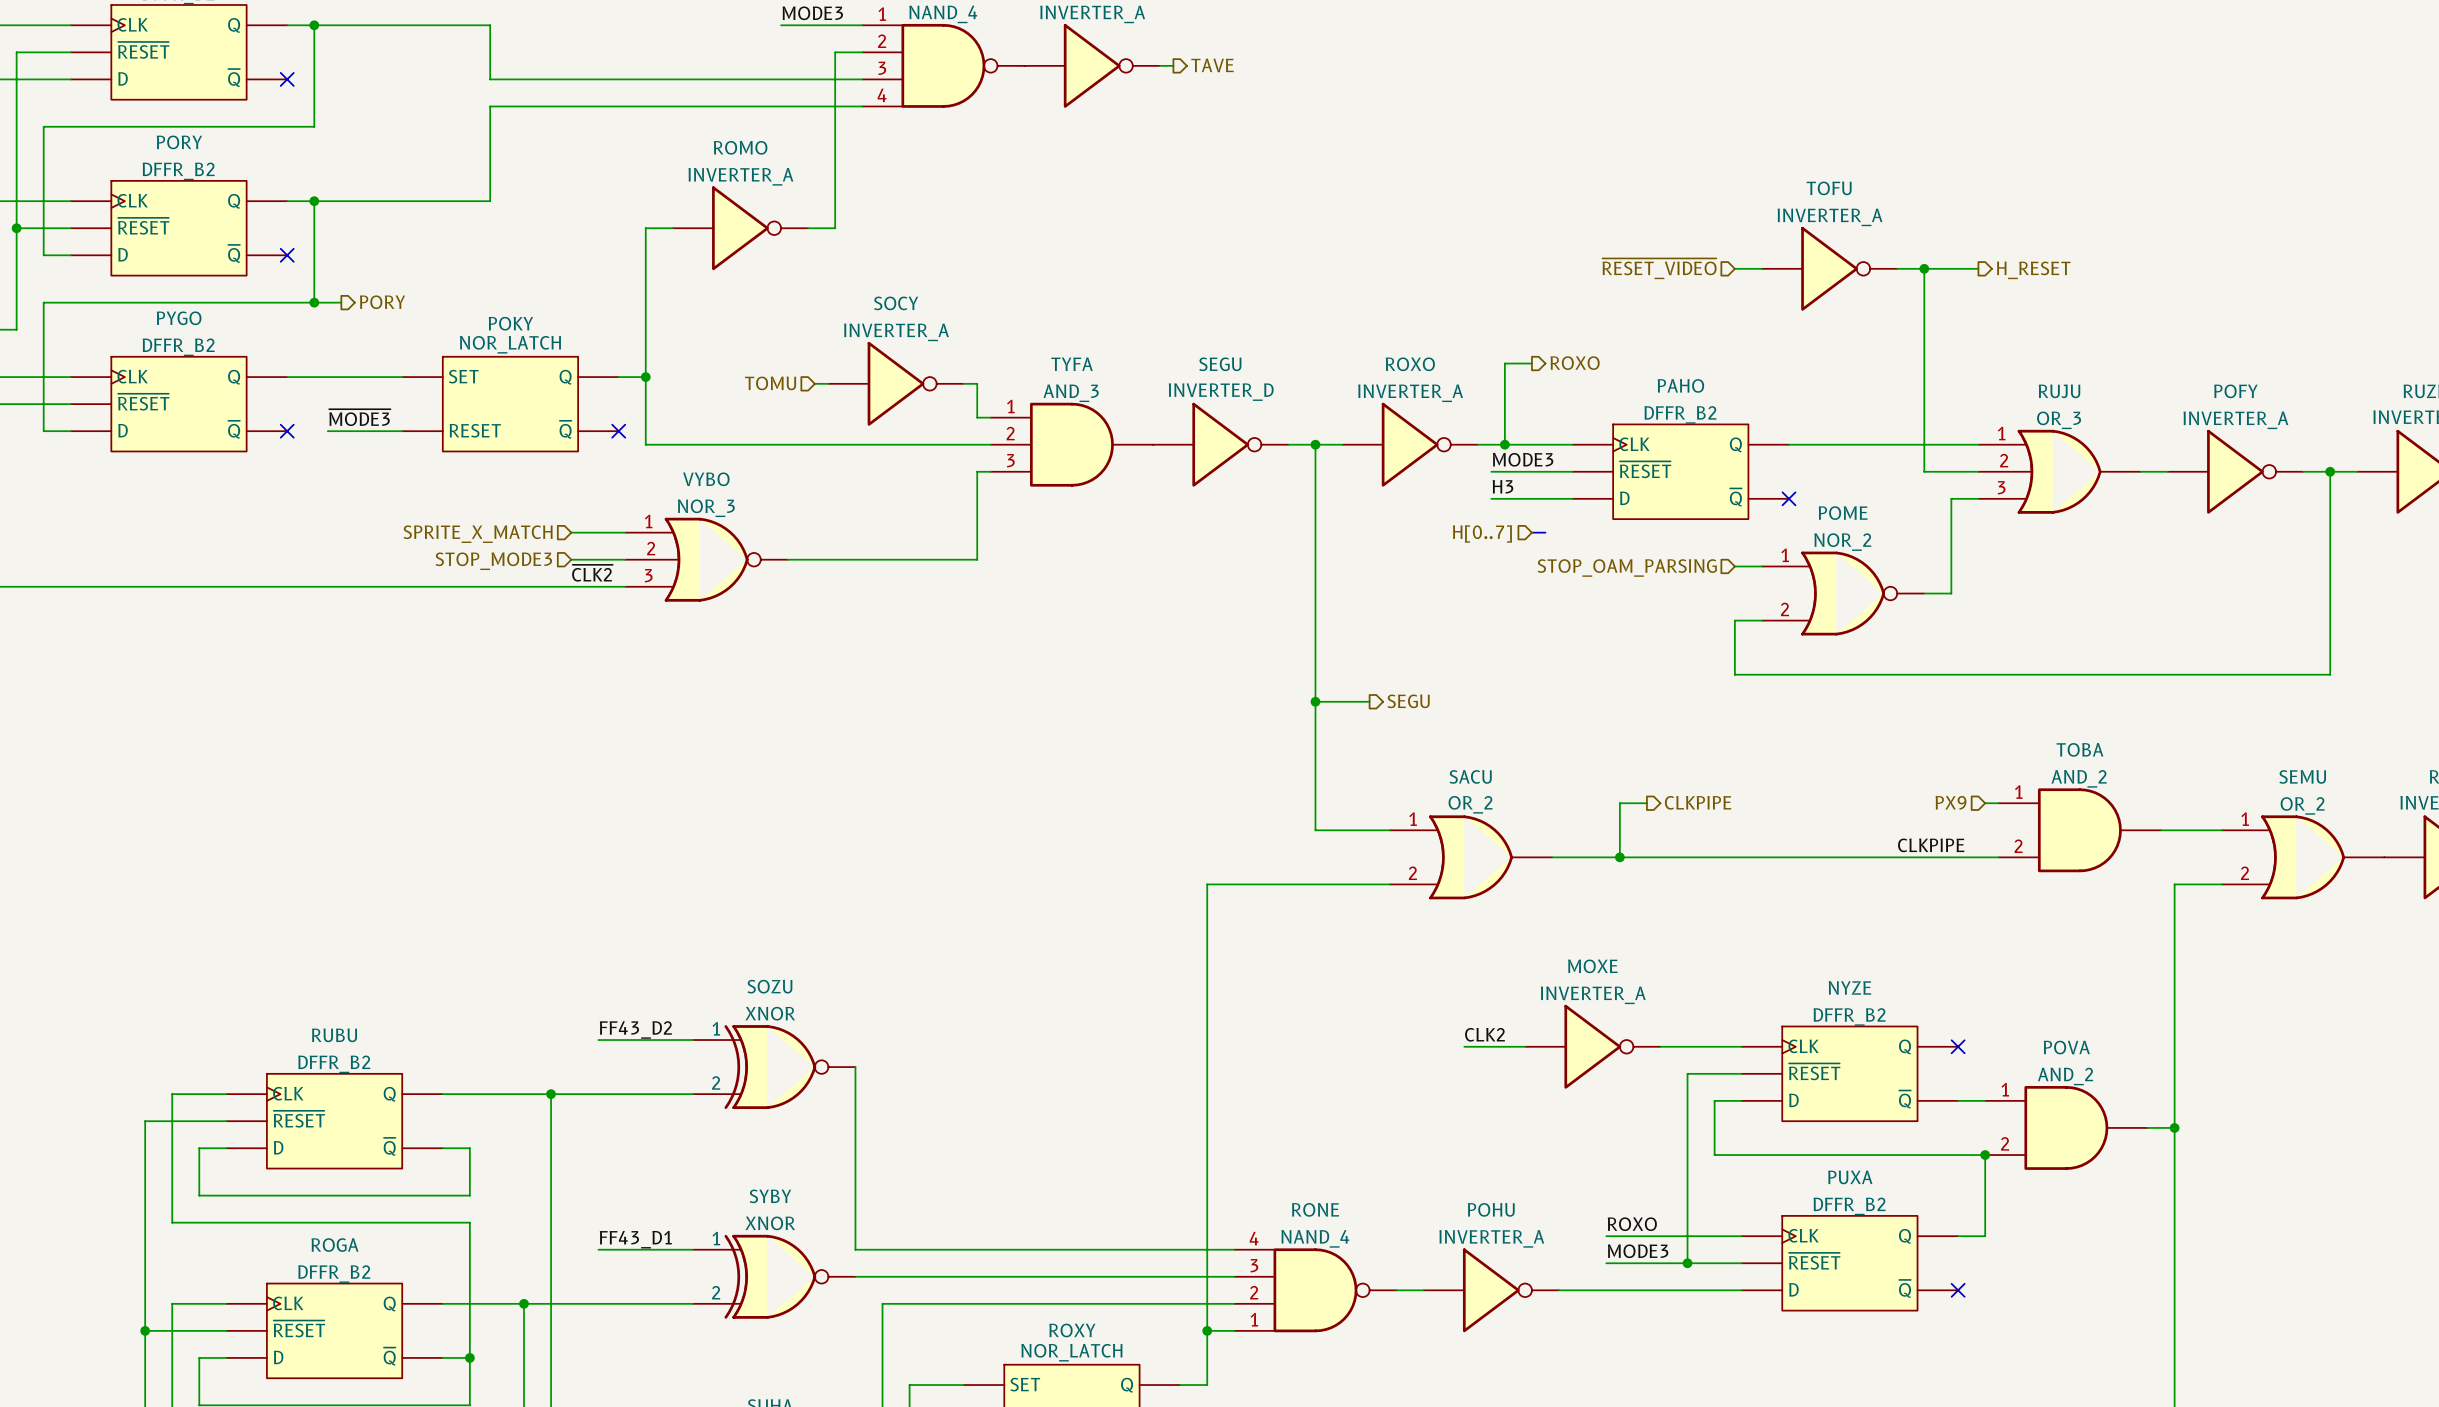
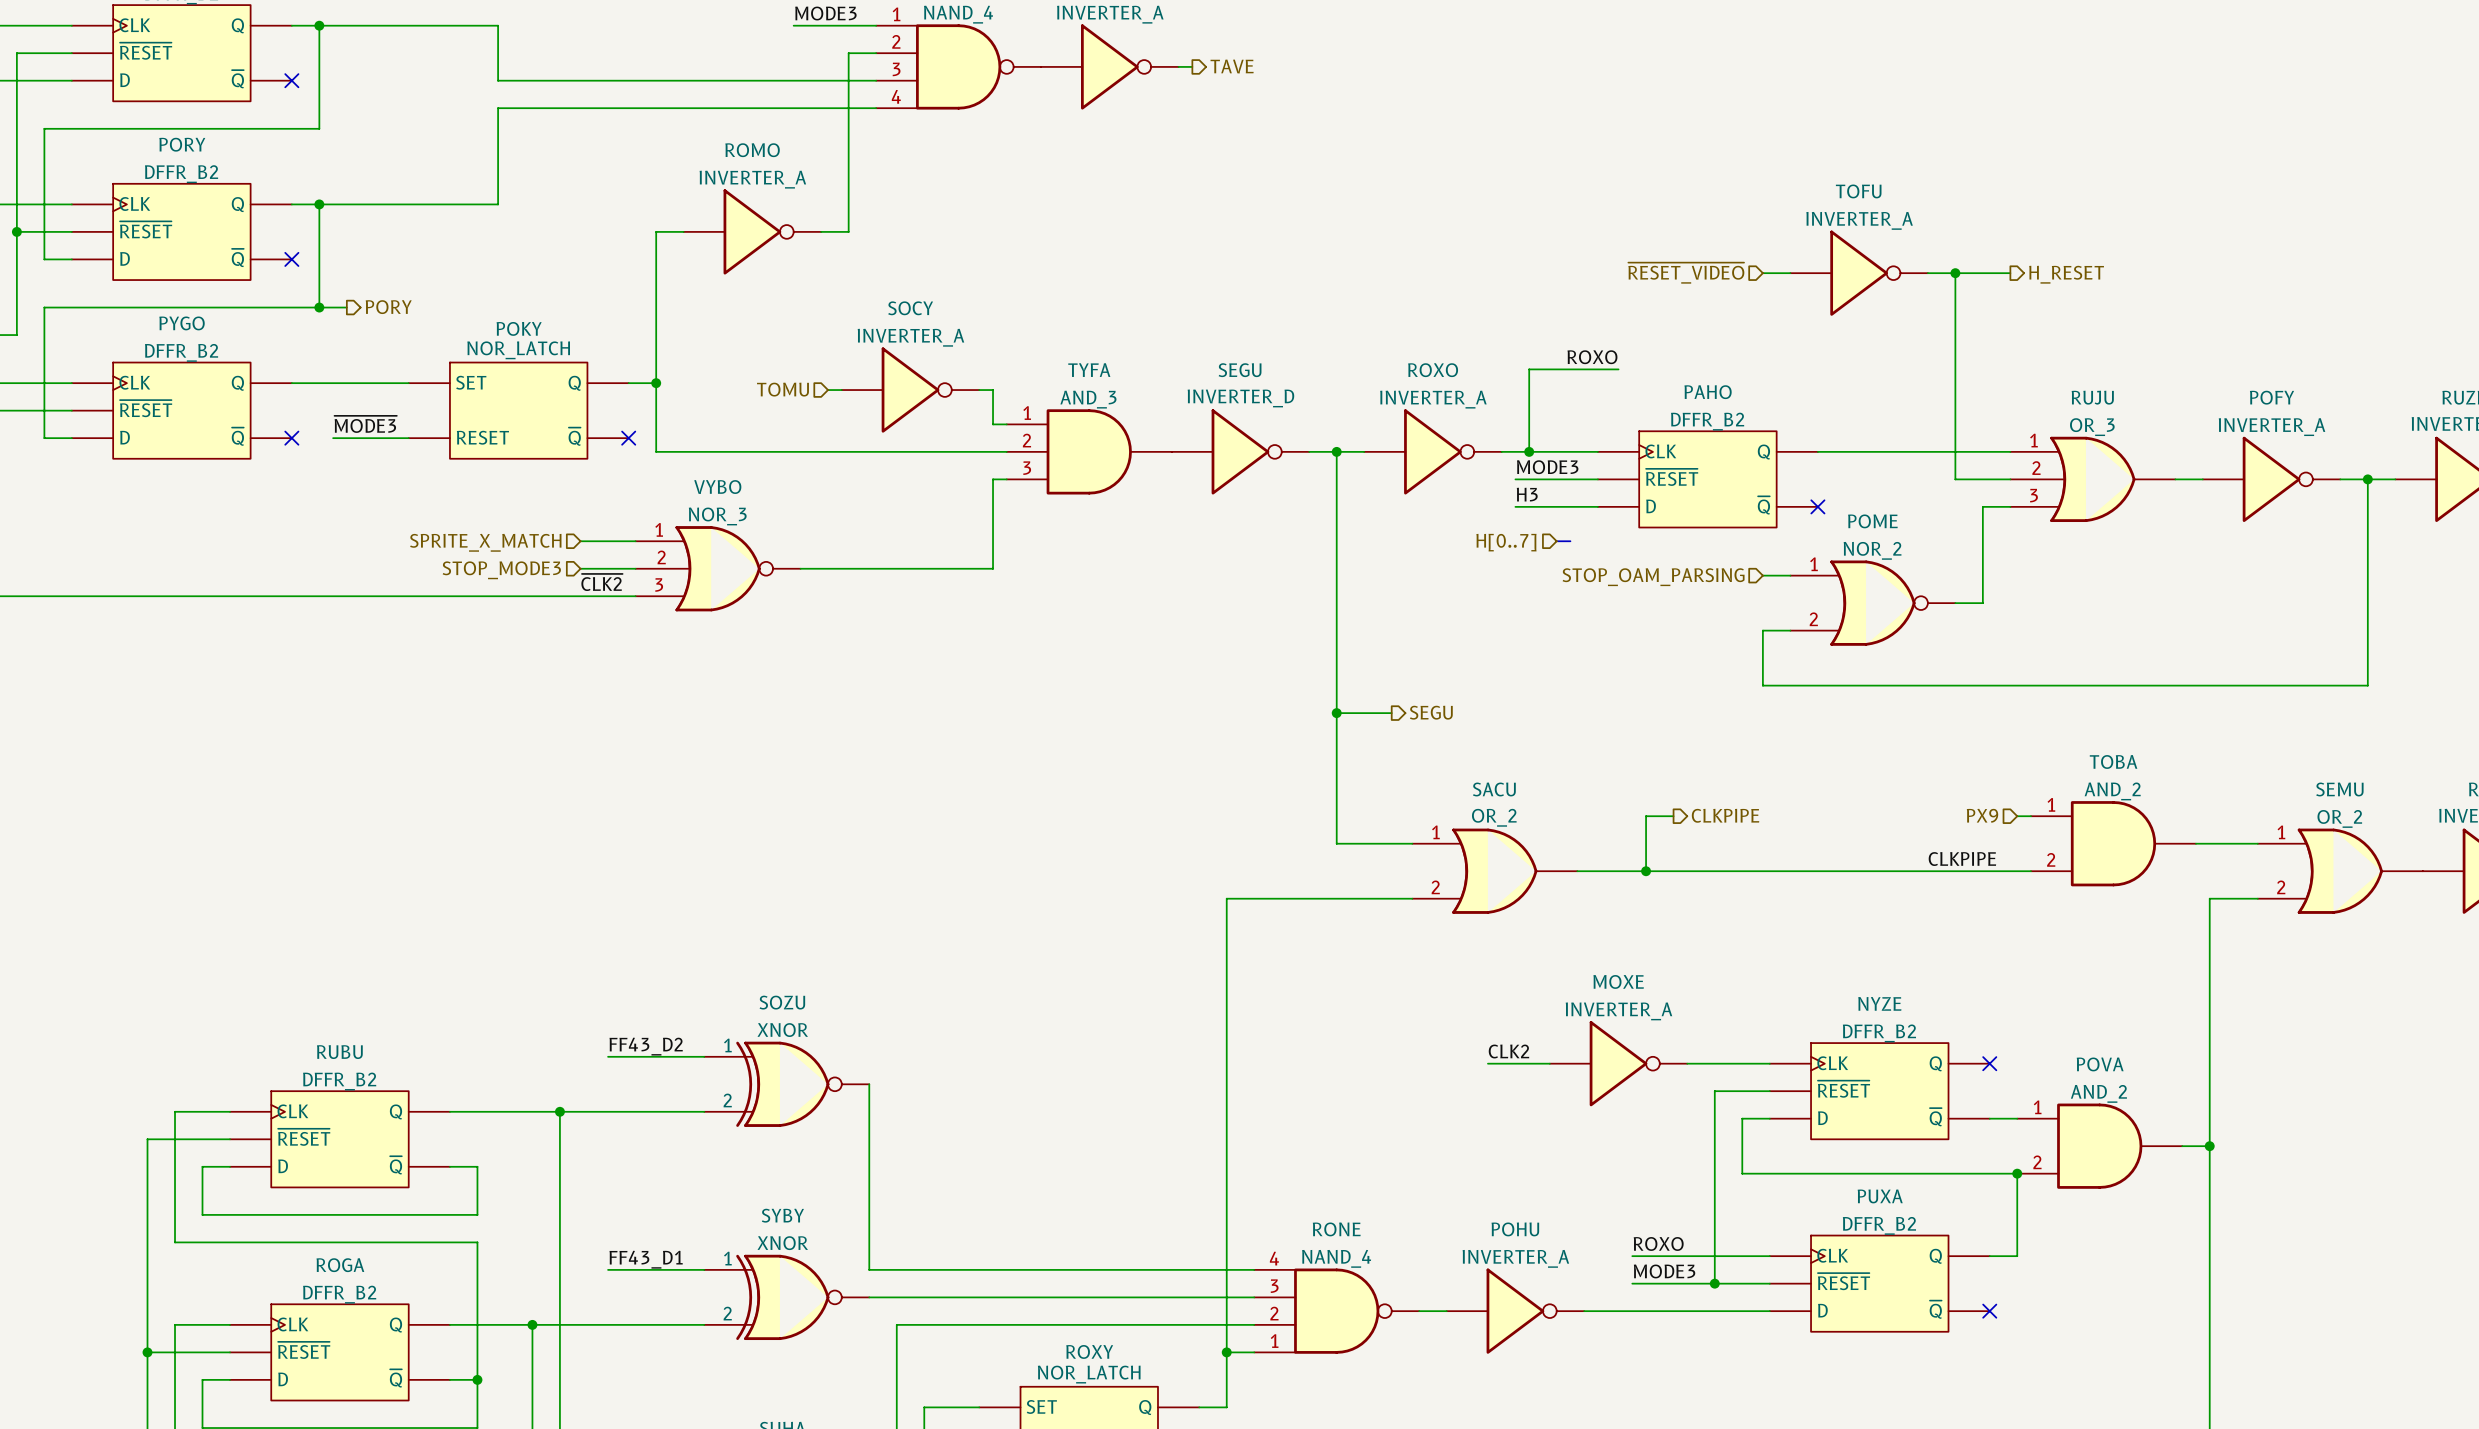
label: none -> ROXO (1592, 357)
wire: none -> (1556, 369) (1618, 369)
hierarchical label: ROXO (1575, 363) -> none

